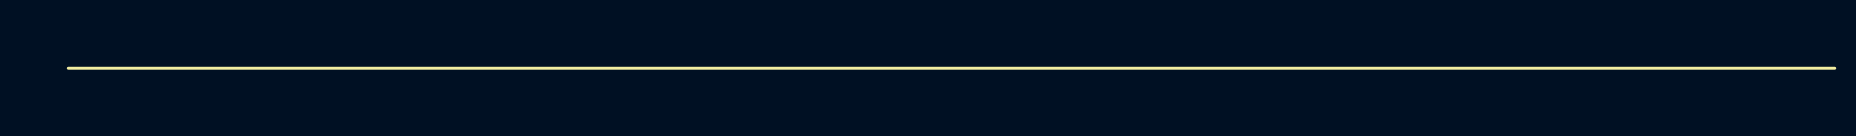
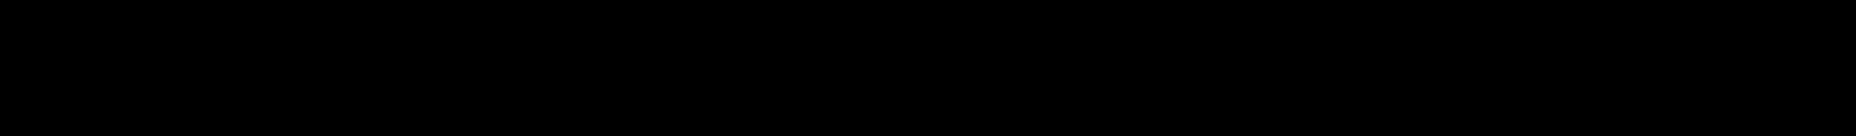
line: (68, 68) (1834, 68) -> none

